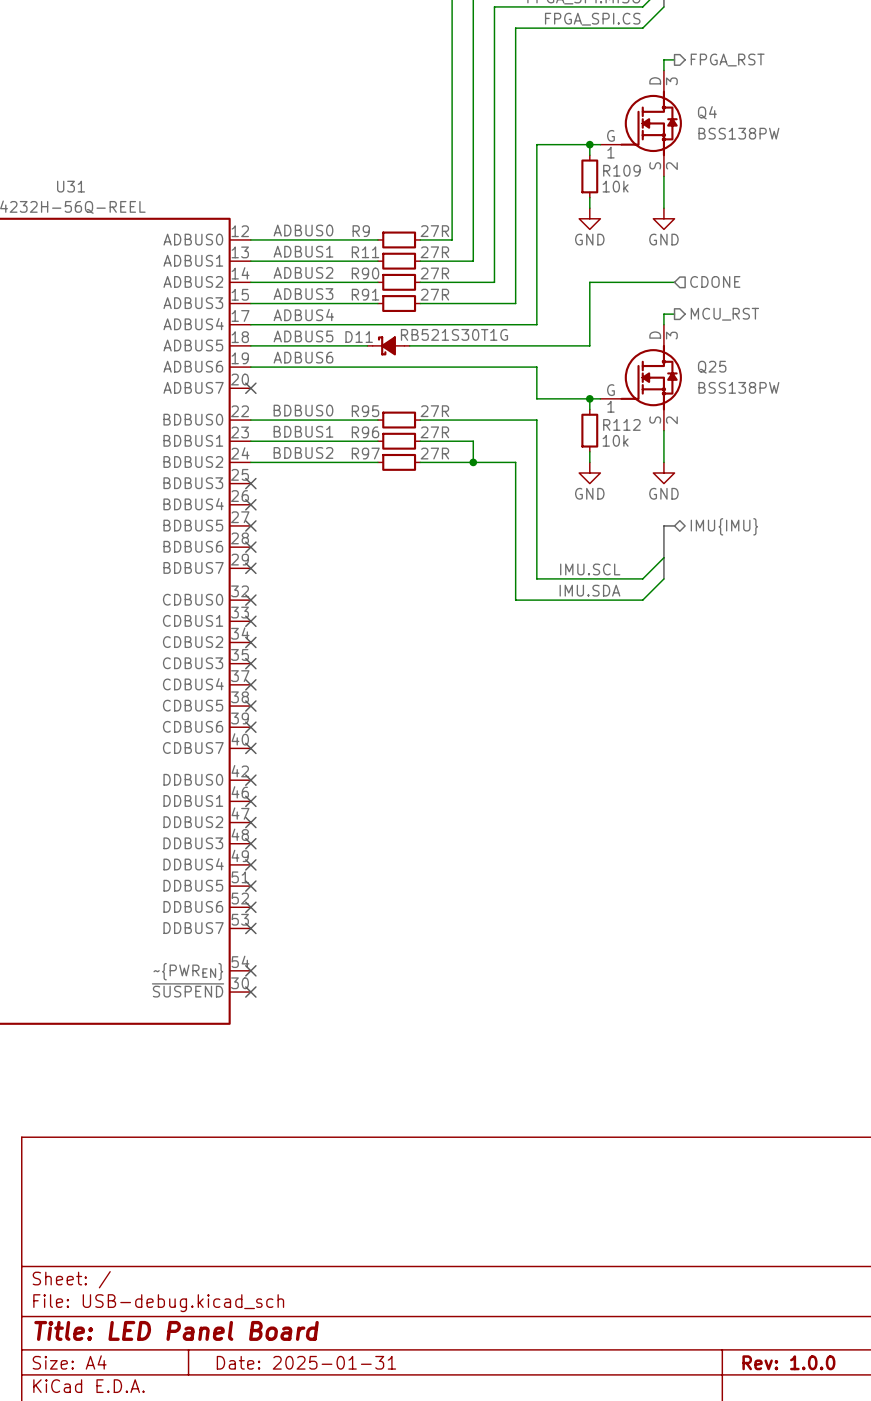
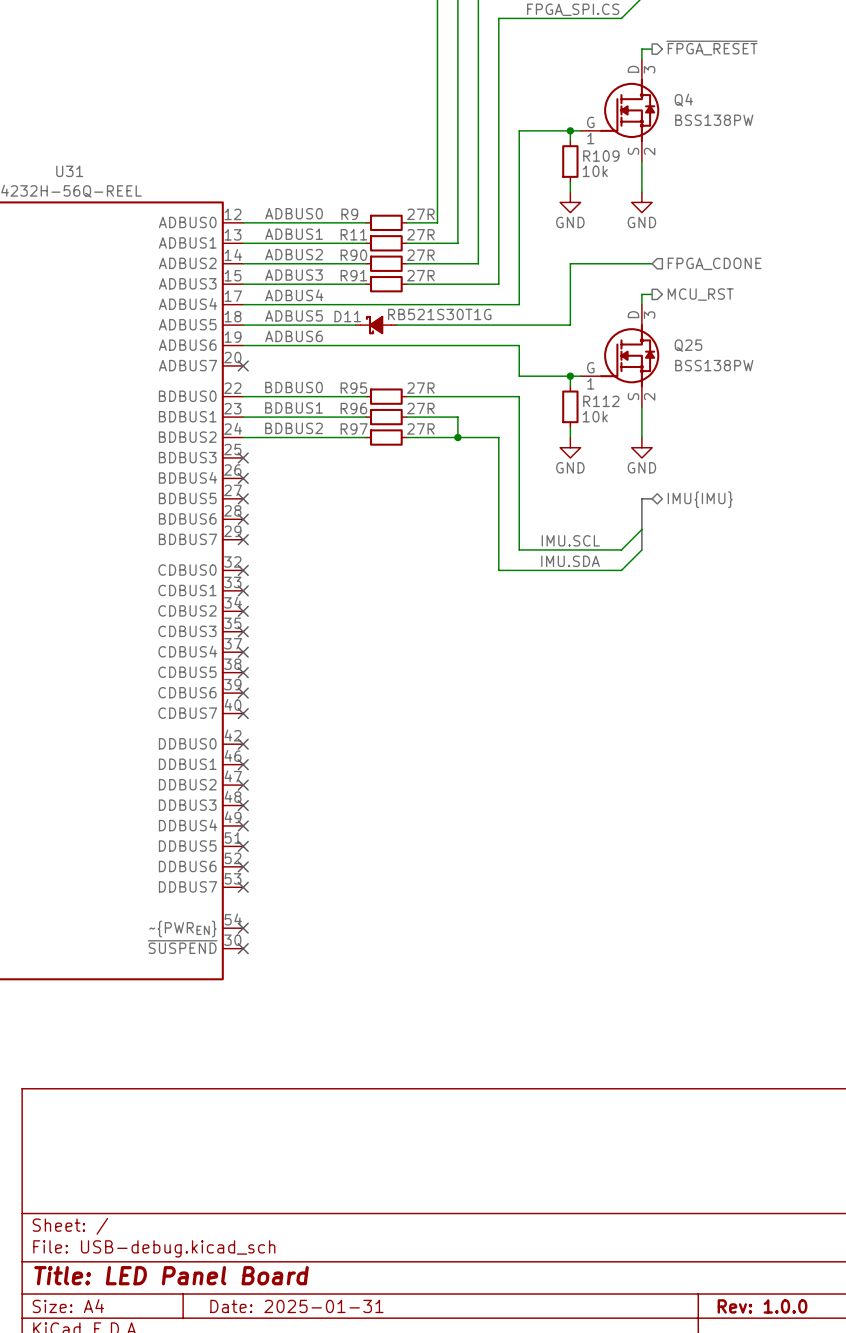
hierarchical label: FPGA_RST (727, 60) -> ~{FPGA_RESET} (711, 48)
hierarchical label: CDONE (715, 281) -> FPGA_CDONE (714, 263)

